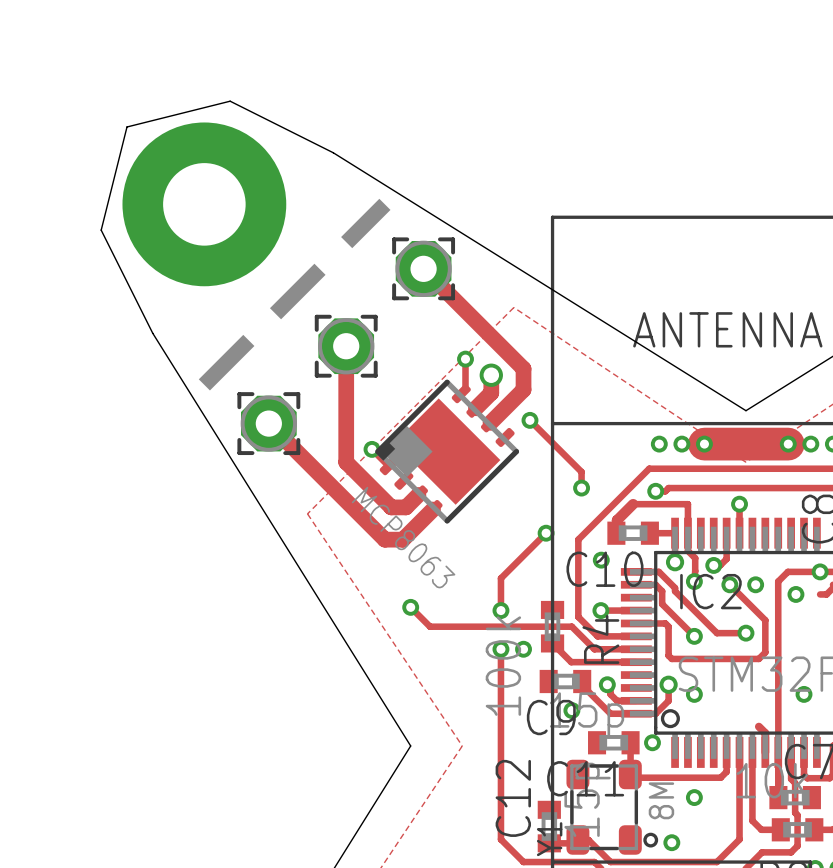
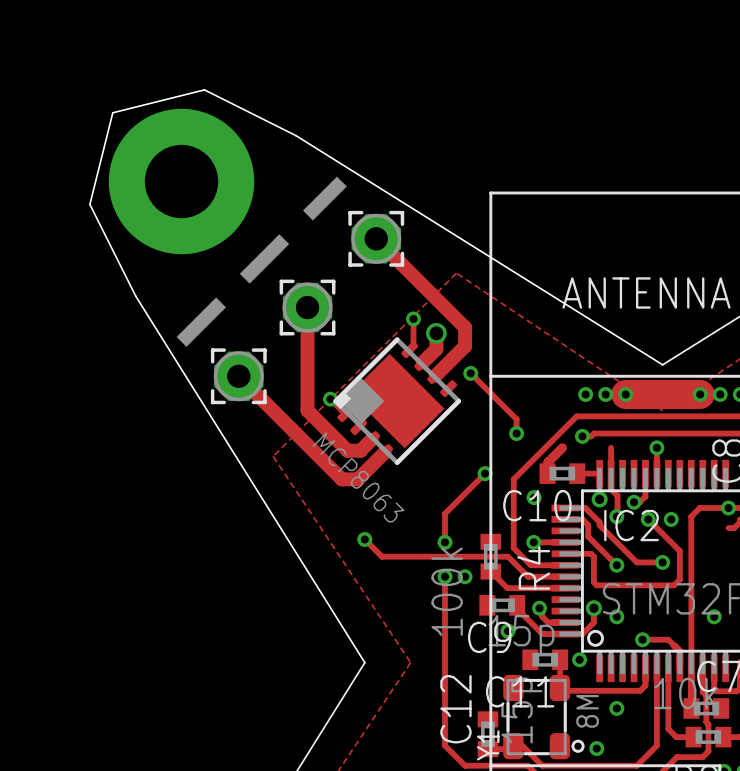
track: (633, 504) (687, 504) -> none
via position: (795, 594) -> (642, 639)
track: none -> (642, 639) (668, 639) (679, 651)

